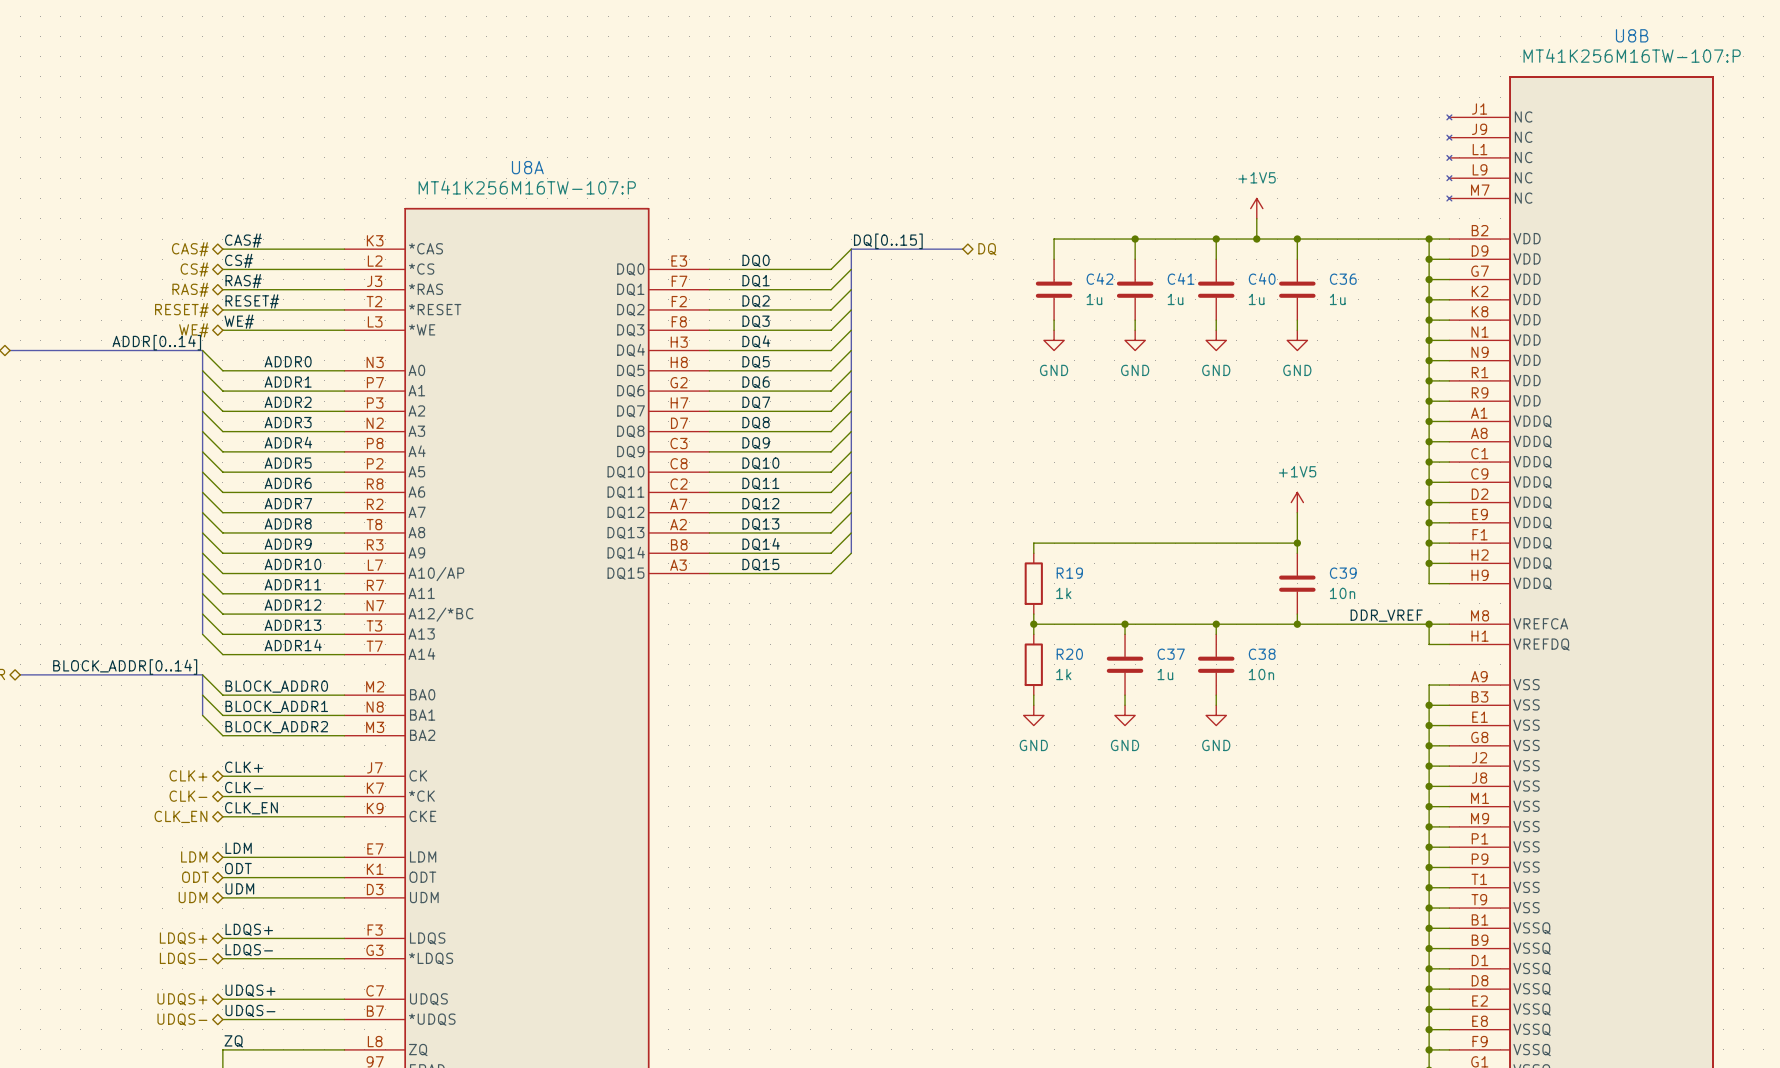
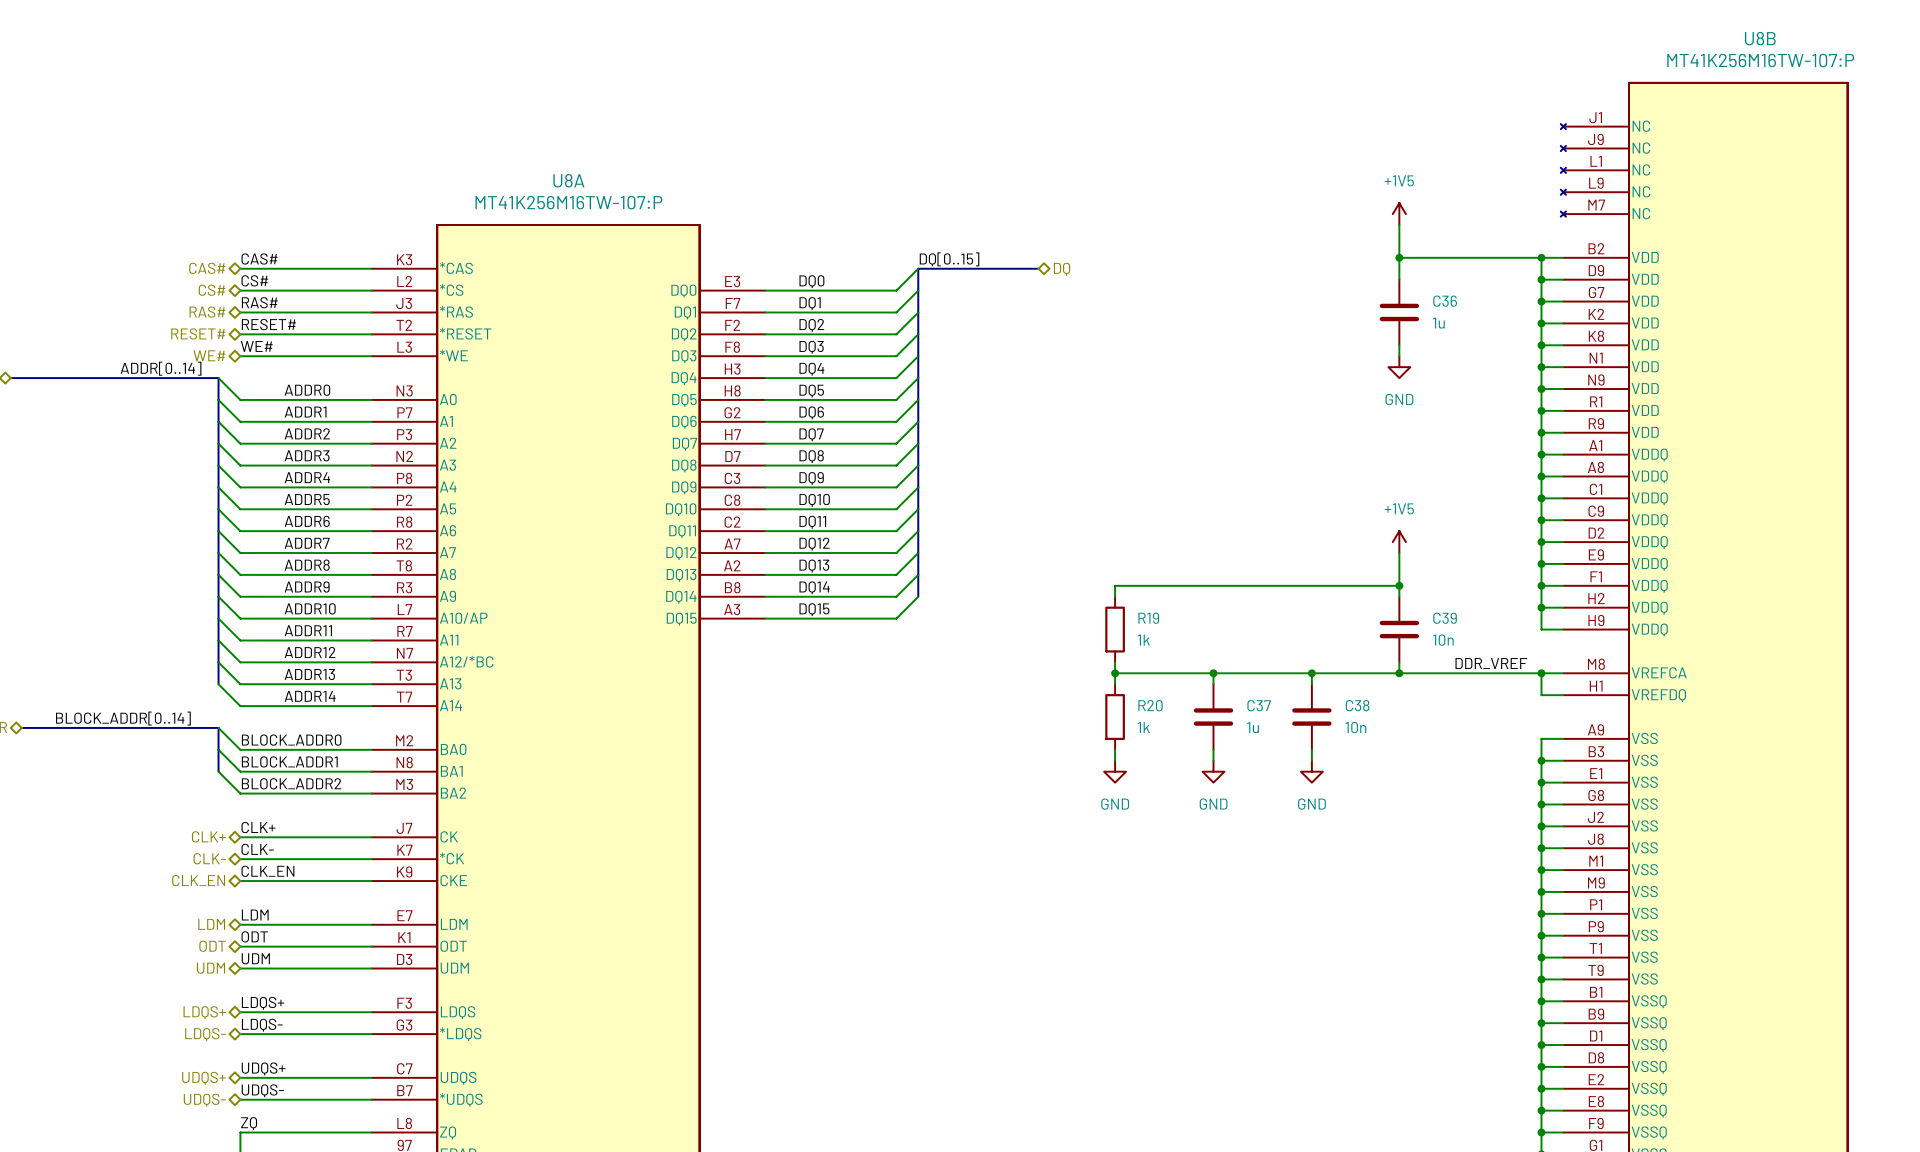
power symbol position: +1V5 (1256, 208) -> +1V5 (1399, 214)
wire: (1256, 218) (1256, 239) -> none
wire: (1135, 239) (1135, 259) -> none
junction: (1135, 239) -> none
wire: (1216, 239) (1216, 259) -> none
junction: (1216, 239) -> none
junction: (1256, 239) -> none
wire: (1297, 239) (1054, 239) (1054, 259) -> (1399, 257) (1399, 225)
C42: 1u (1054, 289) -> none
C41: 1u (1135, 289) -> none
C40: 1u (1216, 289) -> none
wire: (1054, 320) (1054, 330) -> none
wire: (1135, 320) (1135, 330) -> none
wire: (1216, 320) (1216, 330) -> none
power symbol: GND (1054, 340) -> none
power symbol: GND (1135, 340) -> none
power symbol: GND (1216, 340) -> none

